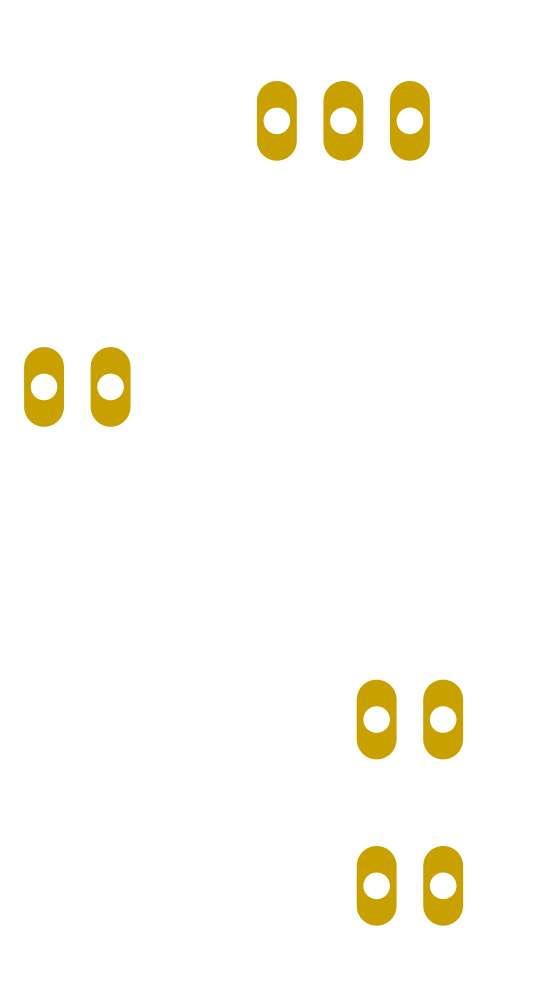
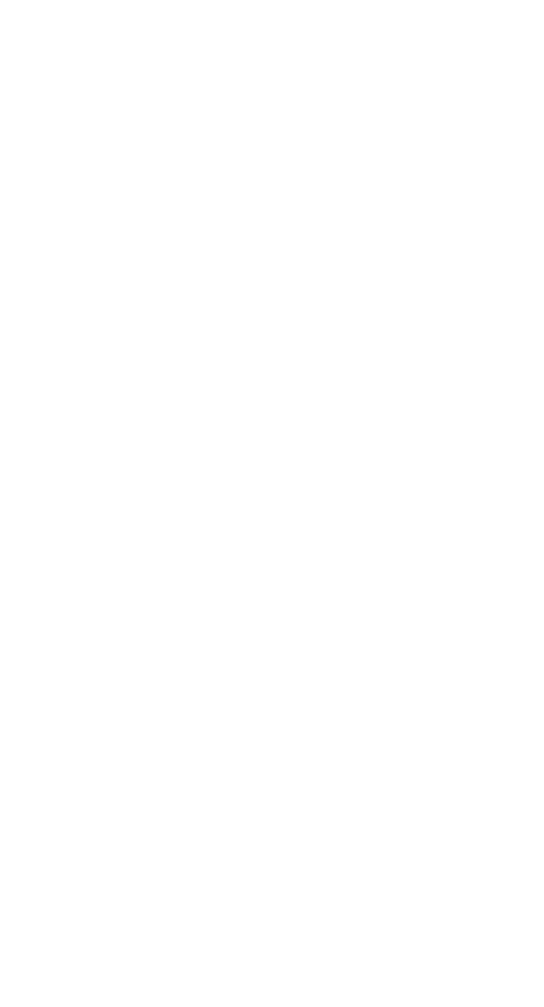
part: (343, 120) -> none
part: (77, 386) -> none
part: (409, 719) -> none
part: (409, 885) -> none

